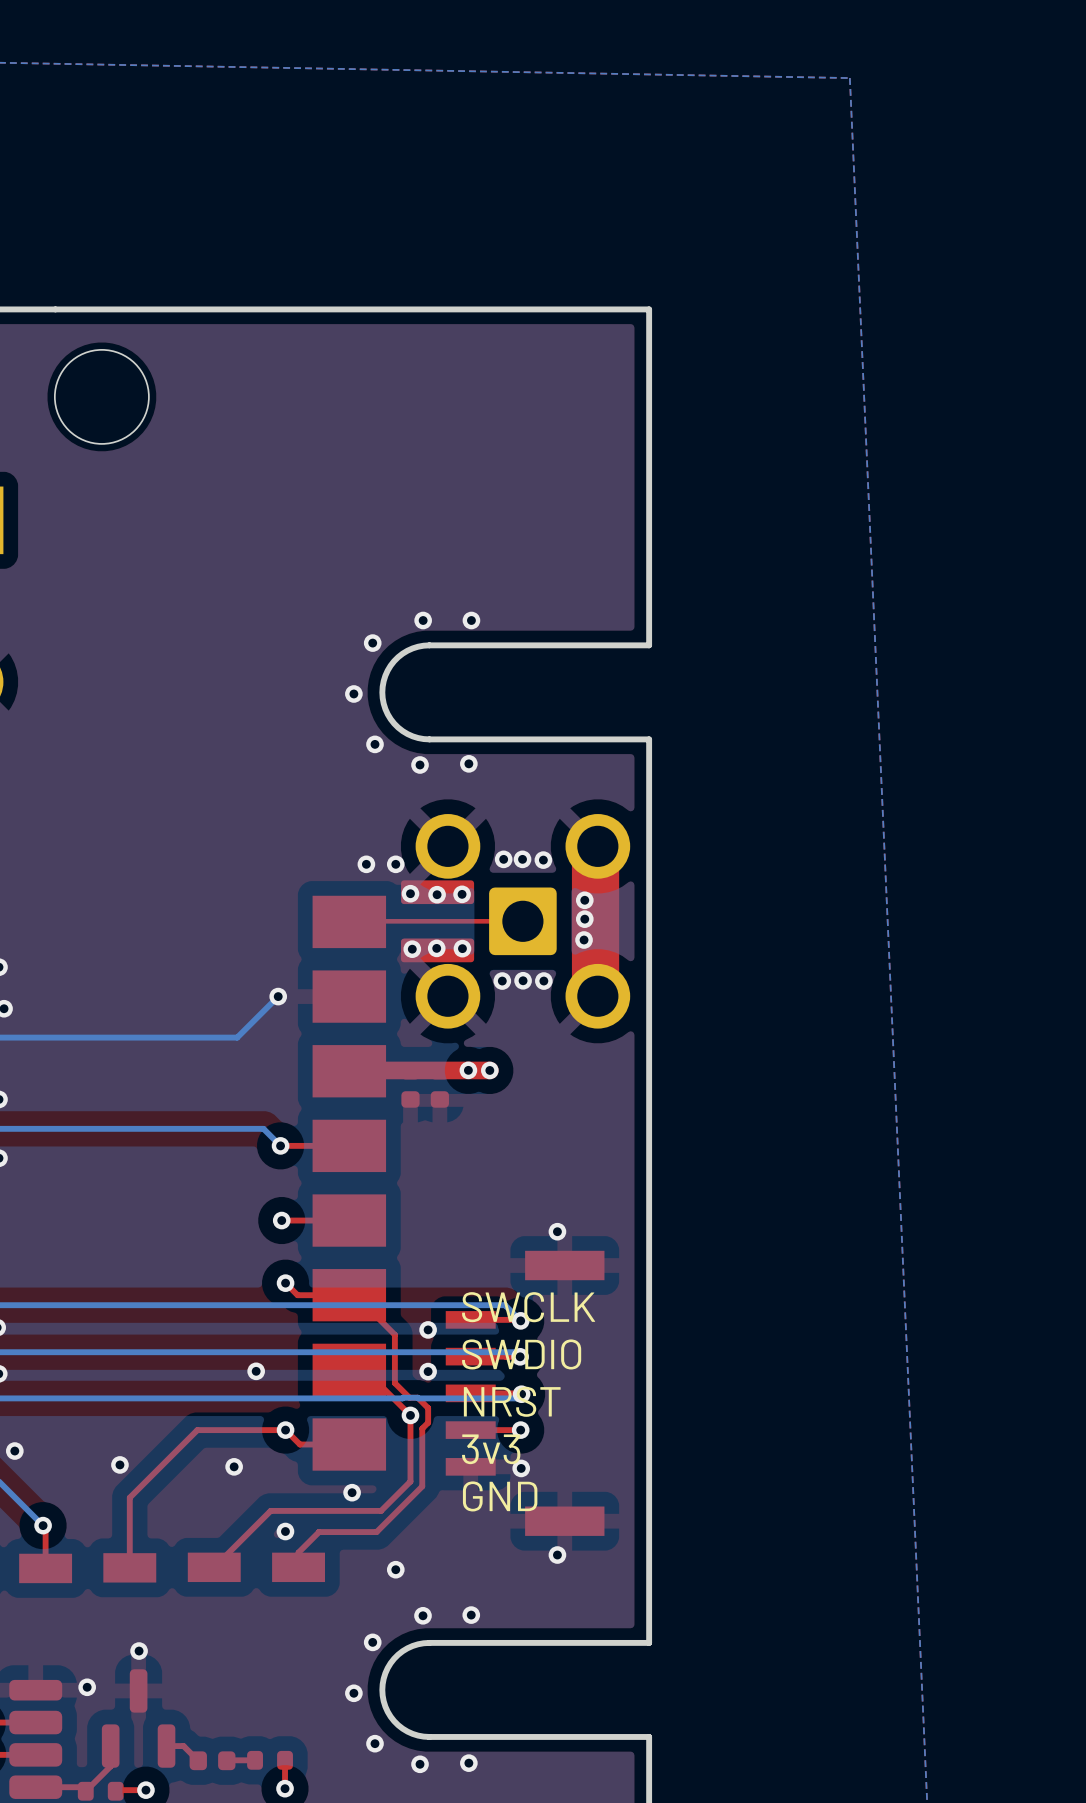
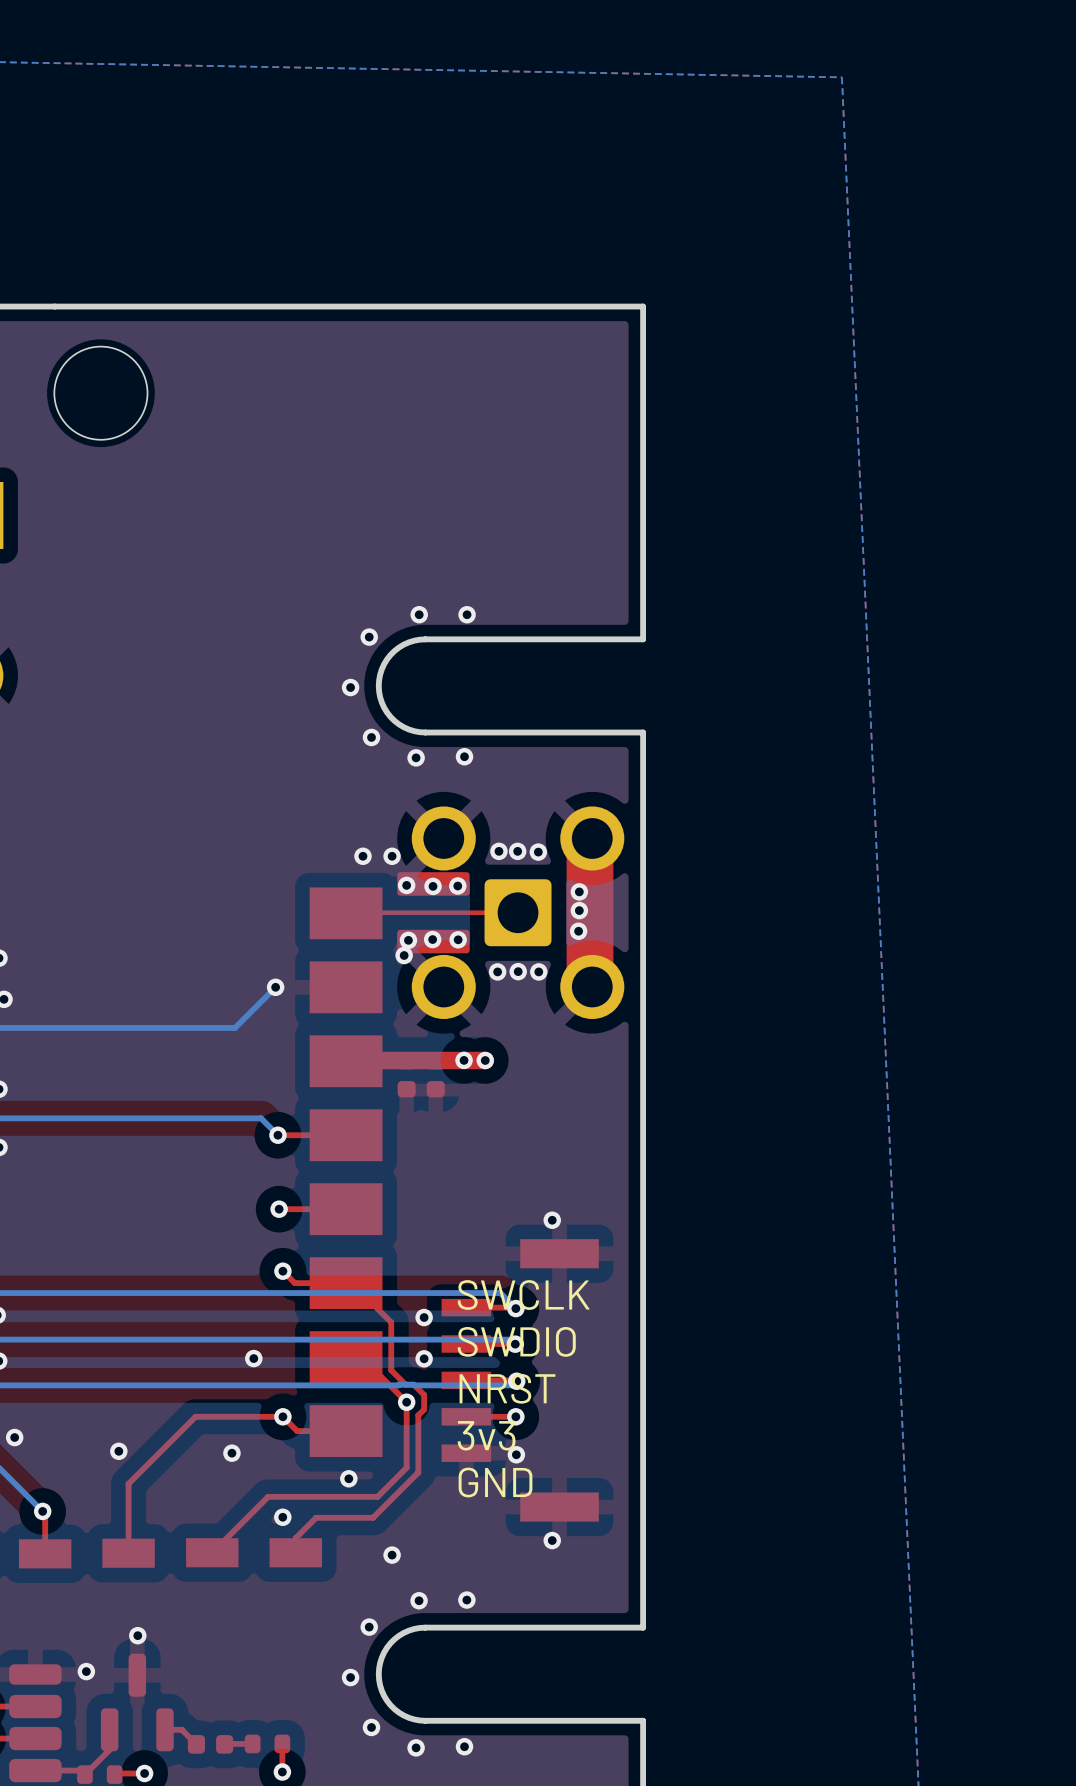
via: none -> (404, 955)

